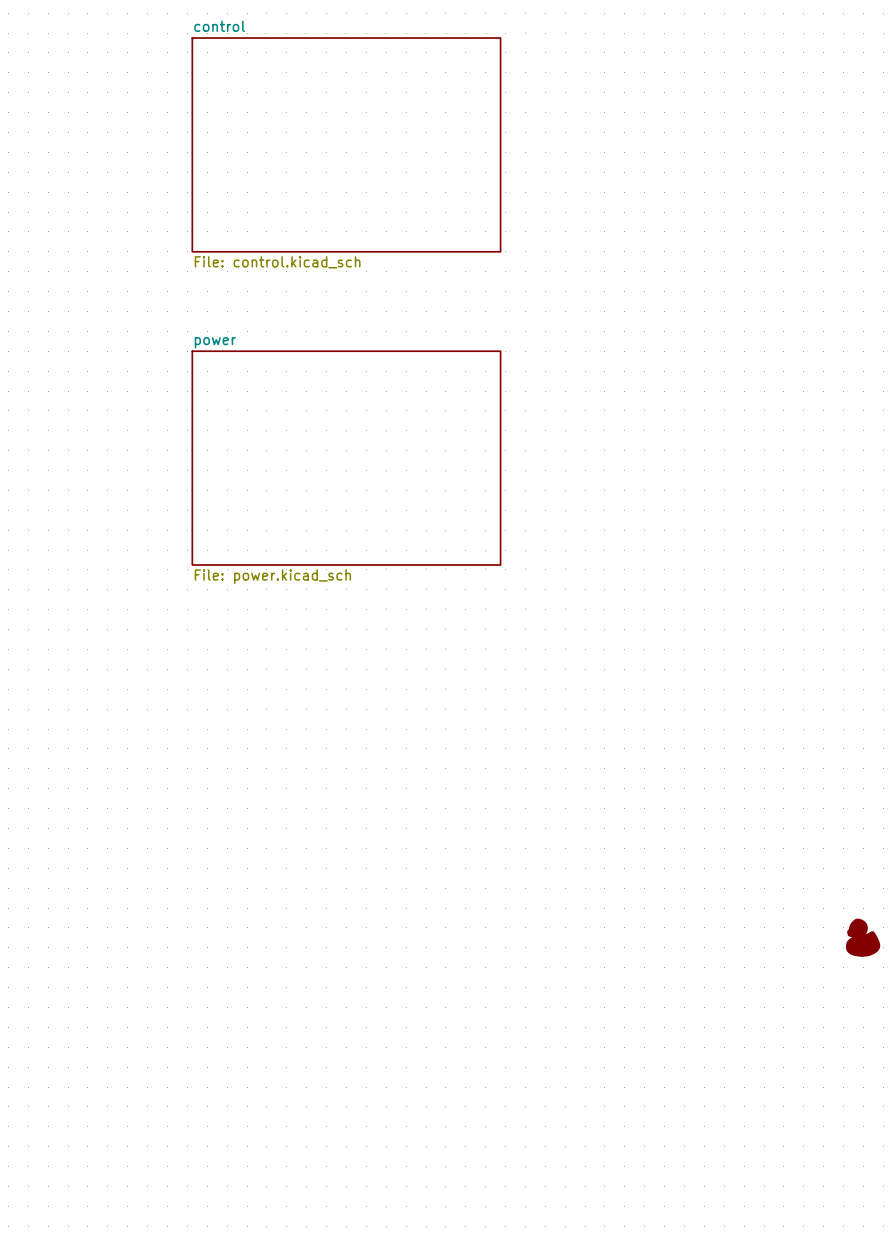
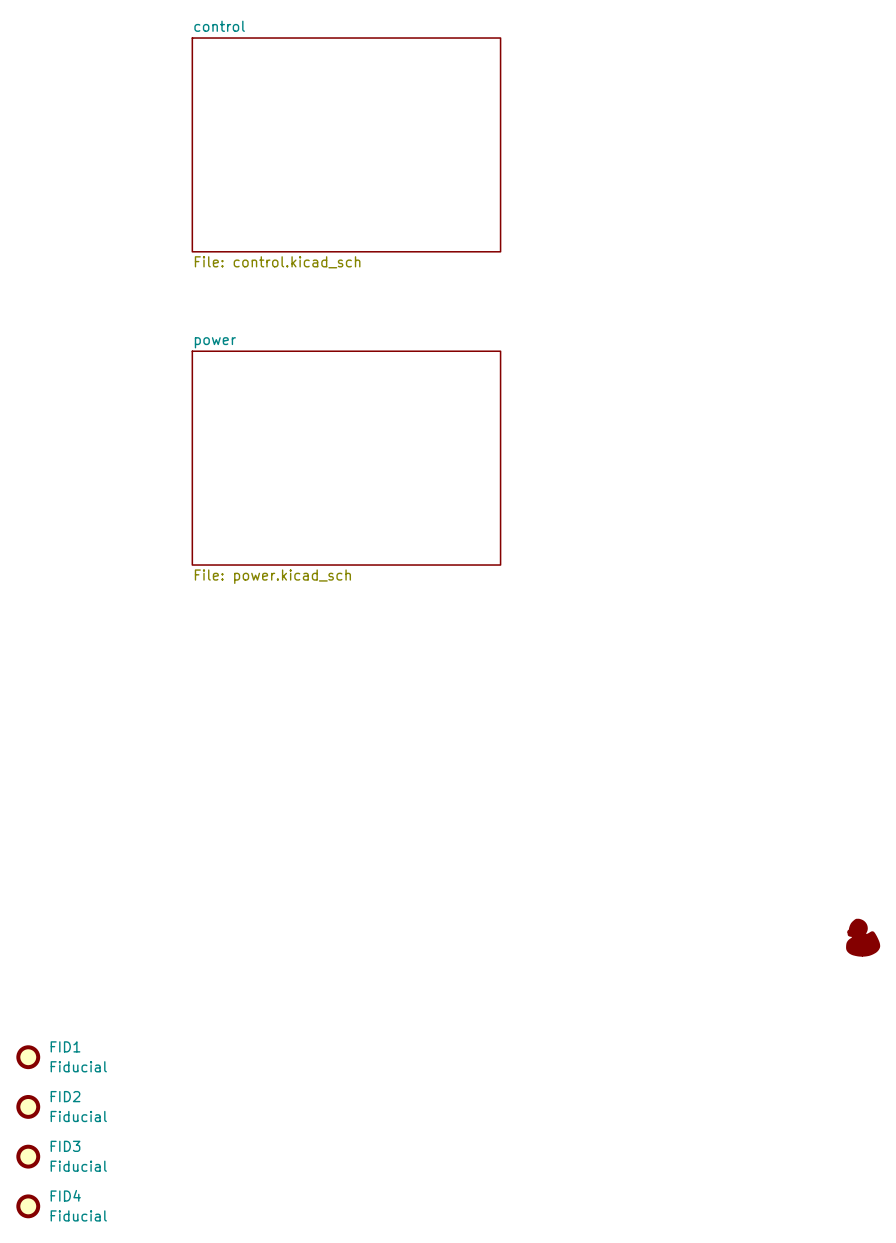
FID1: none -> Fiducial (28, 1057)
FID2: none -> Fiducial (28, 1106)
FID3: none -> Fiducial (28, 1156)
FID4: none -> Fiducial (28, 1206)

